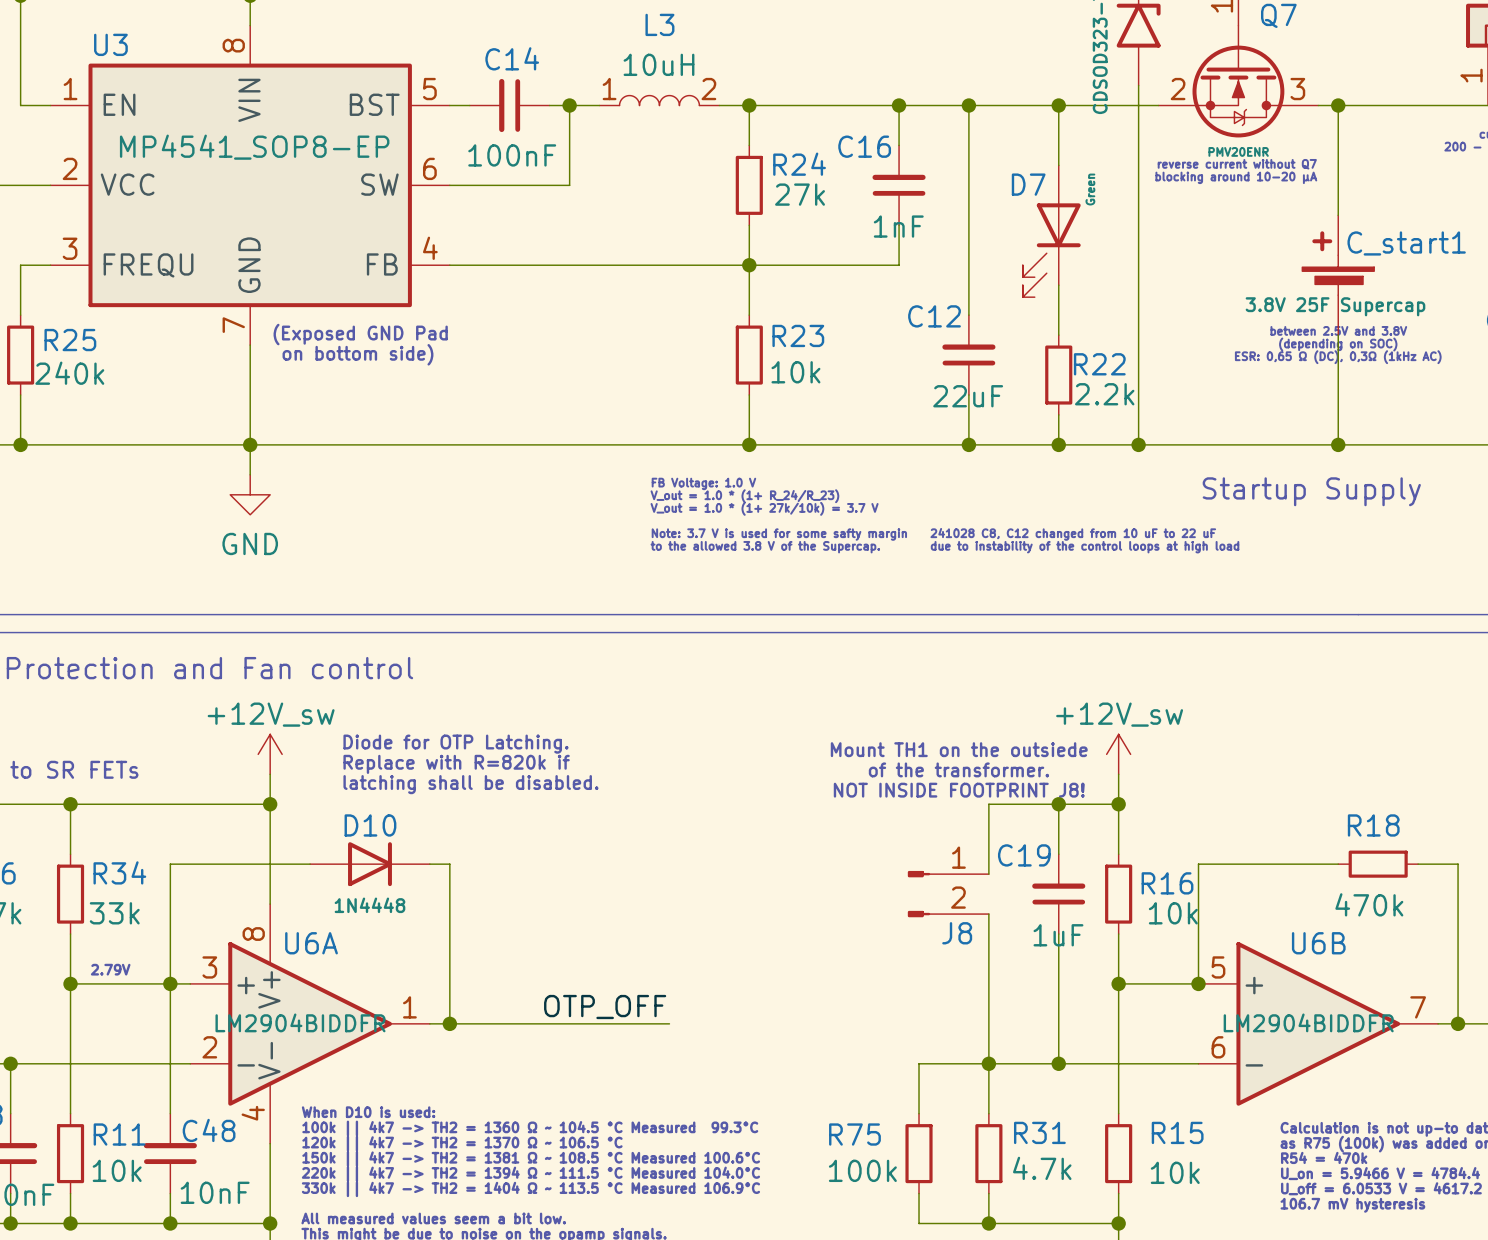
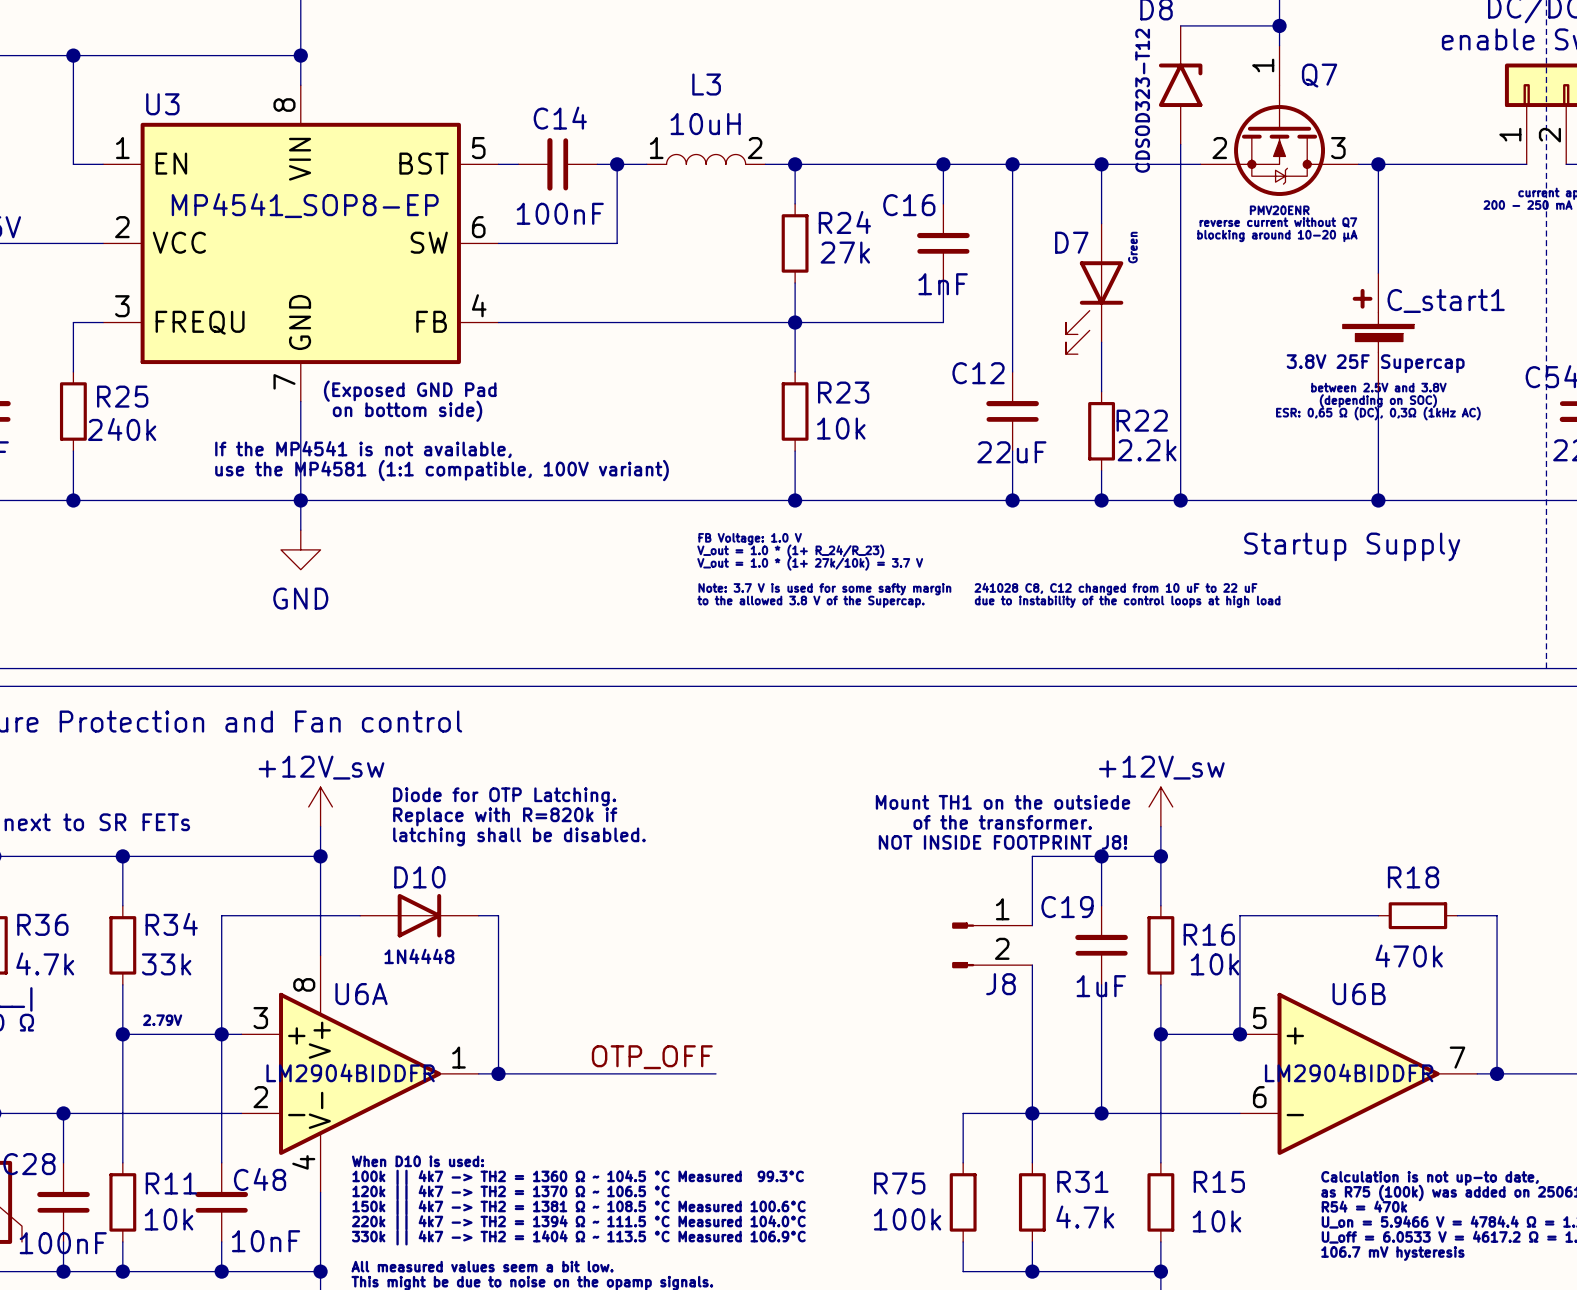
text: none -> If the MP4541 is not available, (363, 449)
text: none -> use the MP4581 (1:1 compatible, 100V variant) (442, 470)

